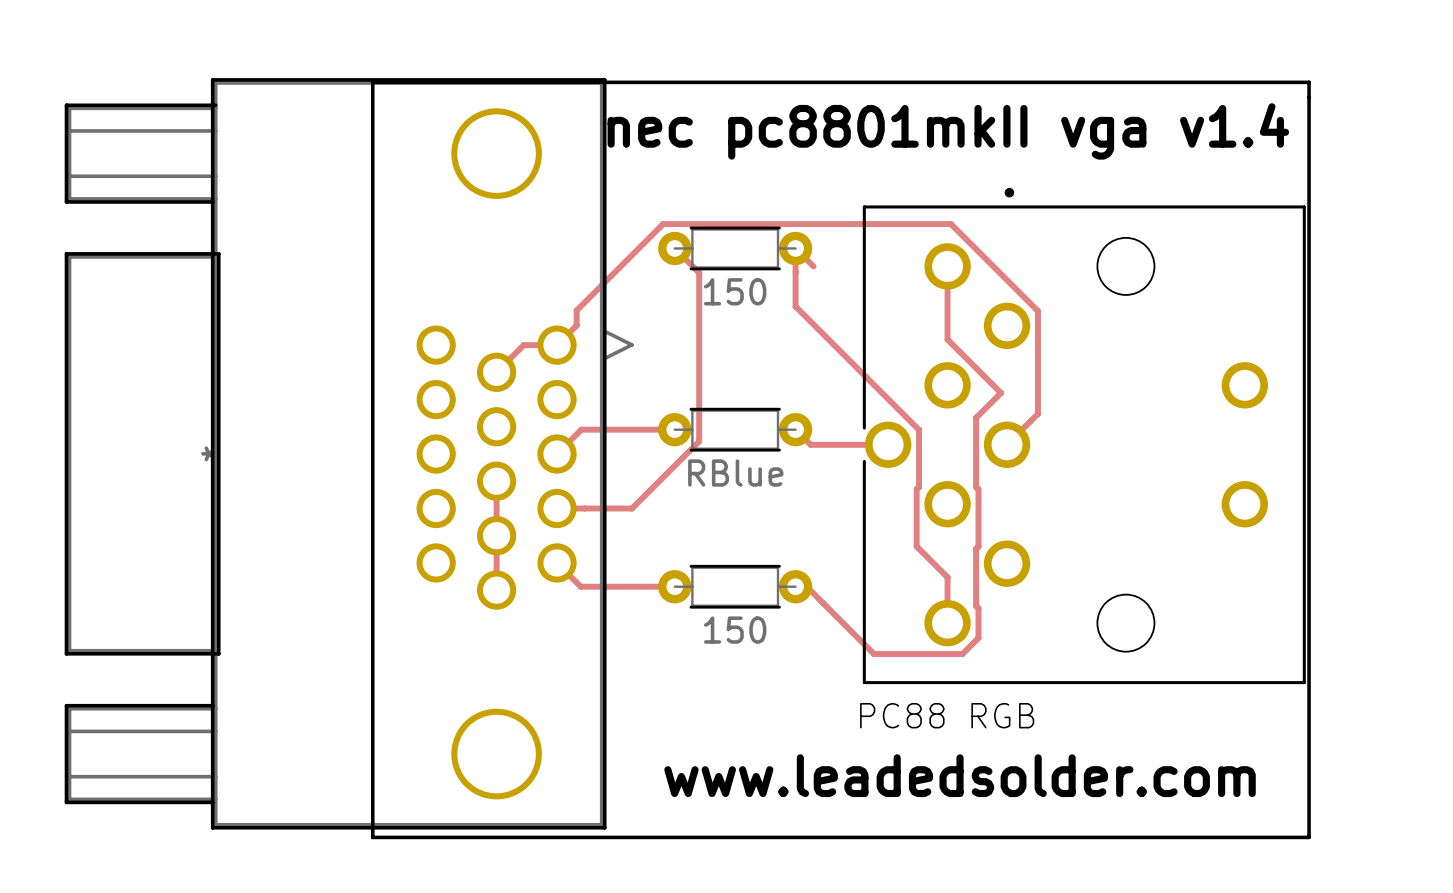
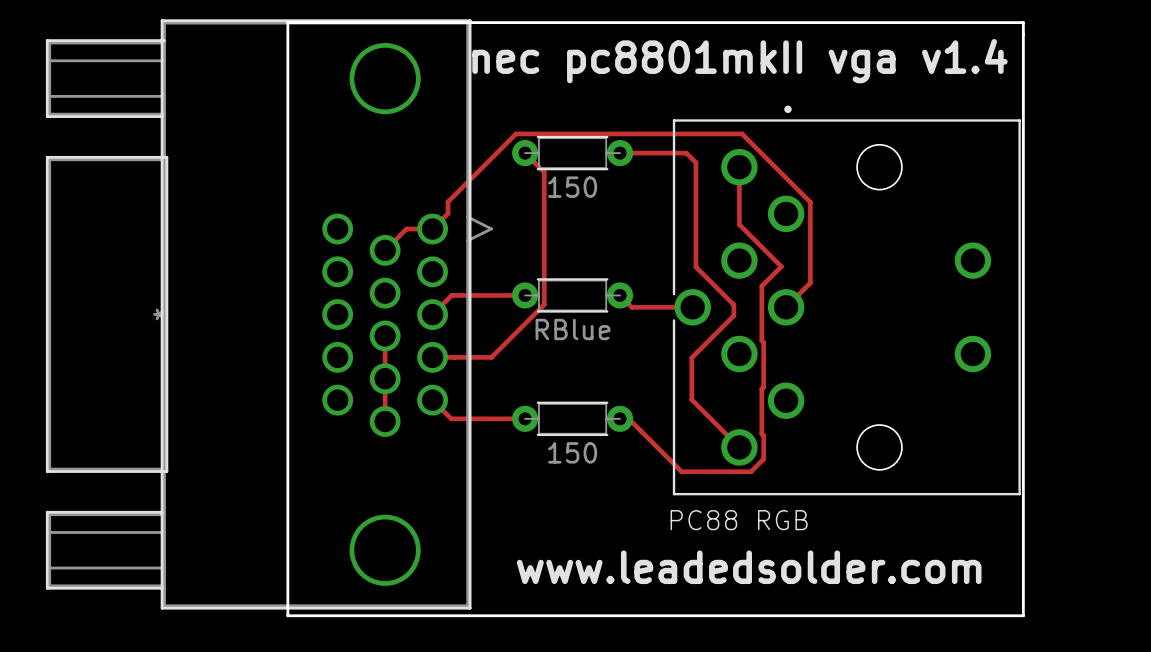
track: (813, 266) (795, 248) (795, 306) (919, 429) (916, 546) (947, 577) (947, 623) -> (620, 153) (686, 153) (695, 162) (695, 266) (733, 304) (733, 315) (691, 357) (691, 399) (739, 447)

